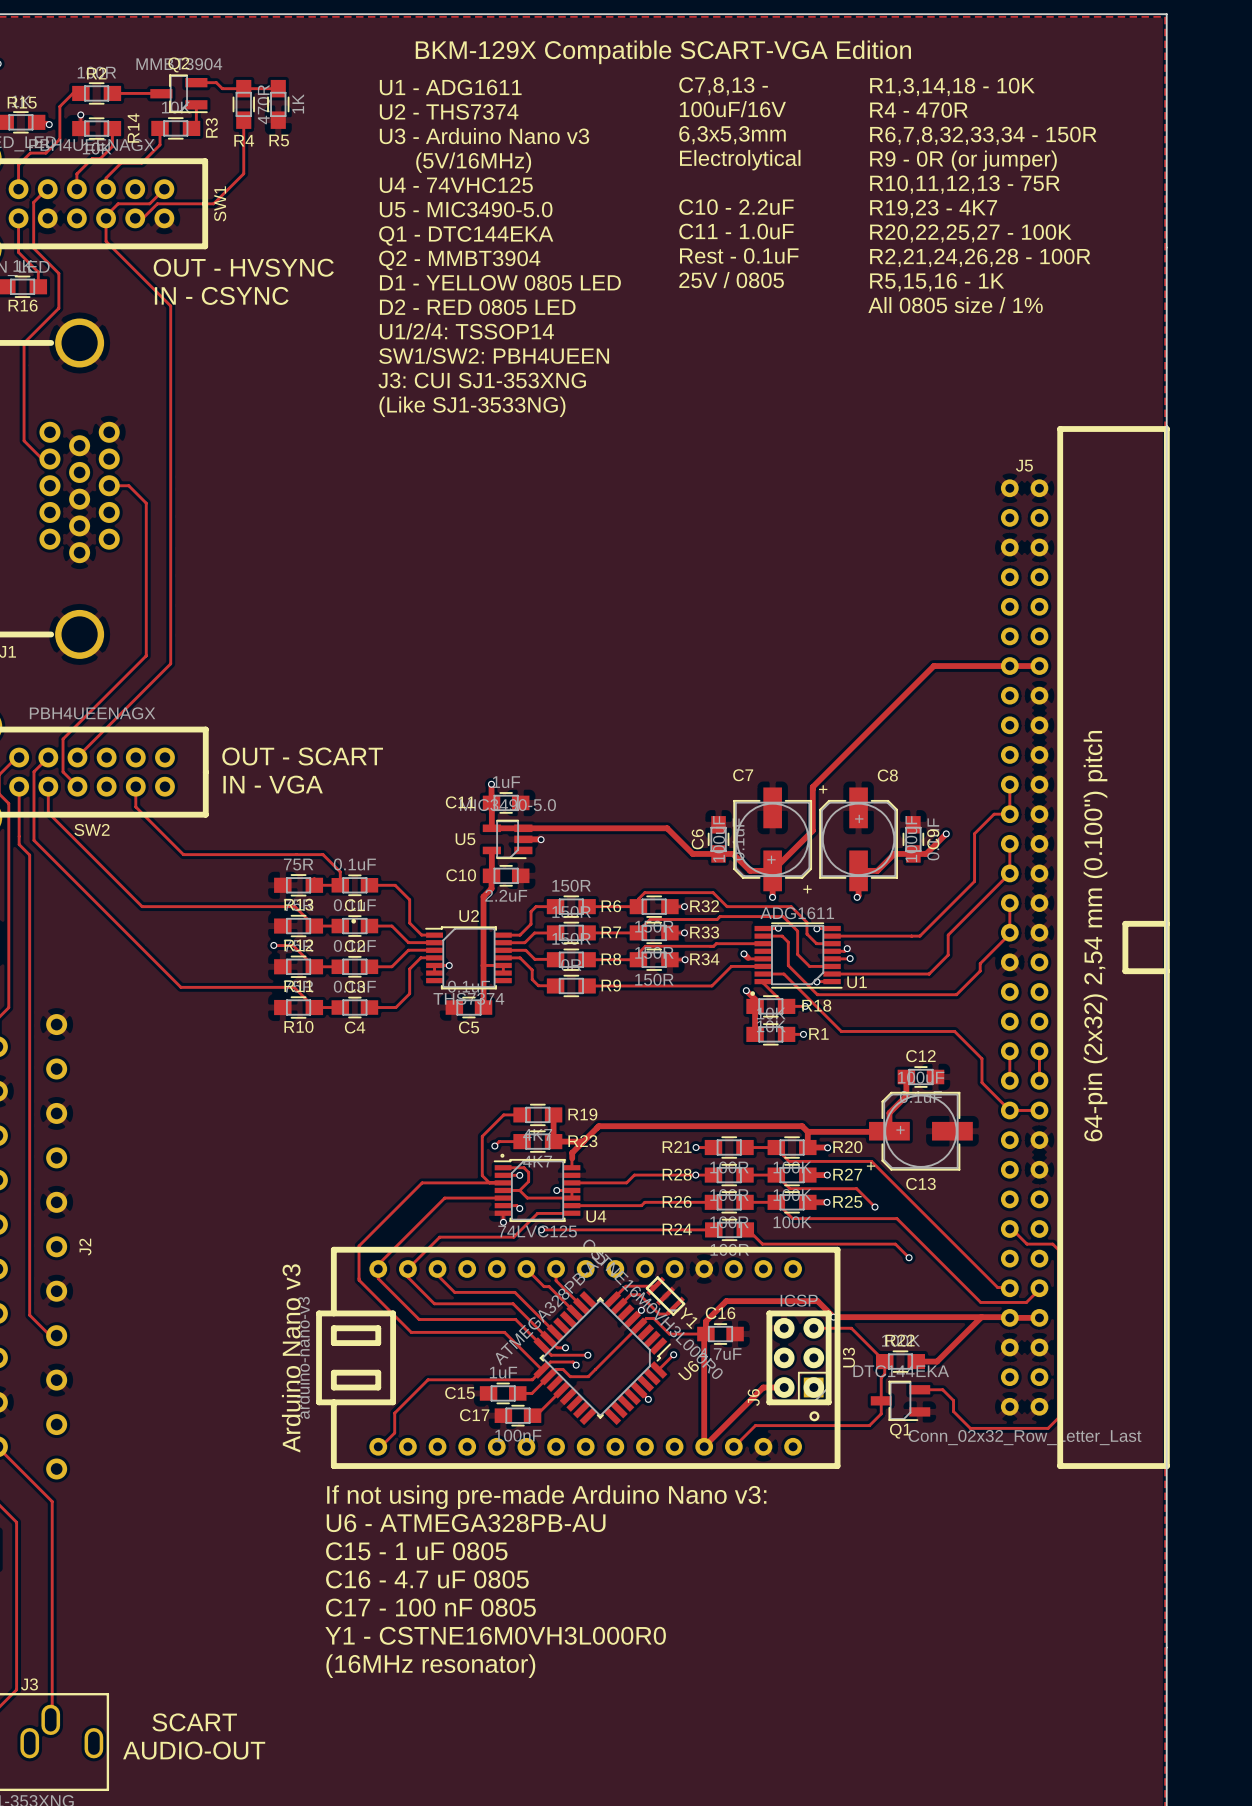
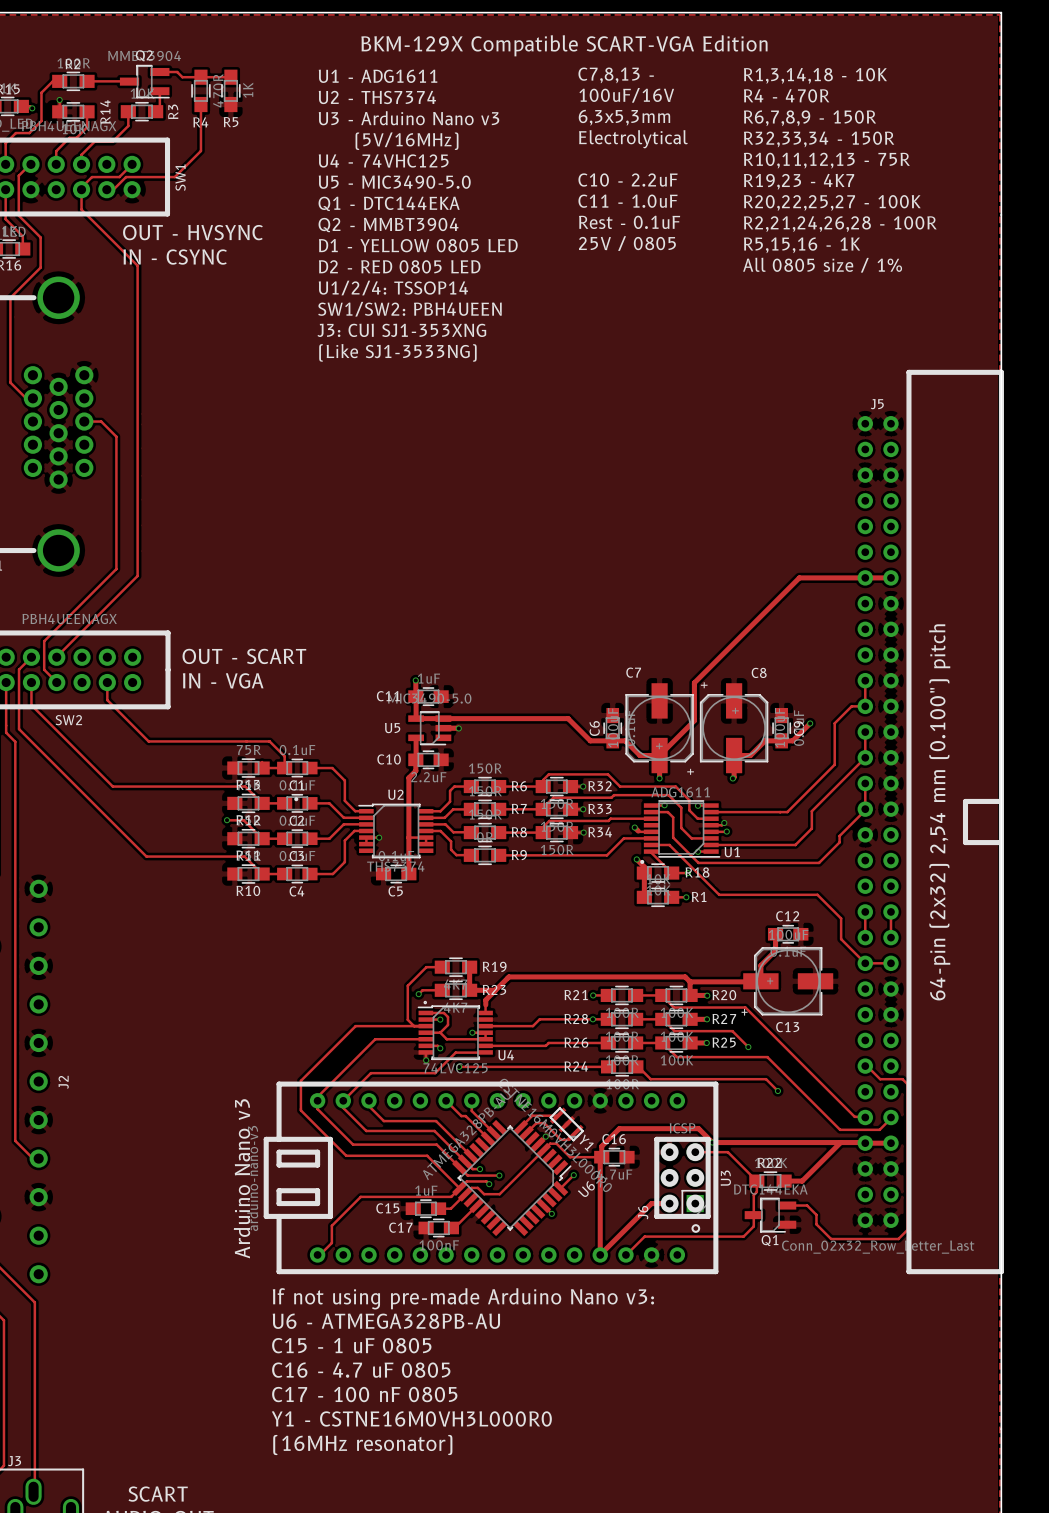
text: R6,7,8,32,33,34 - 150R (983, 135) -> R6,7,8,9 - 150R (810, 118)
text: R9 - 0R (or jumper) (963, 160) -> R32,33,34 - 150R (819, 139)

